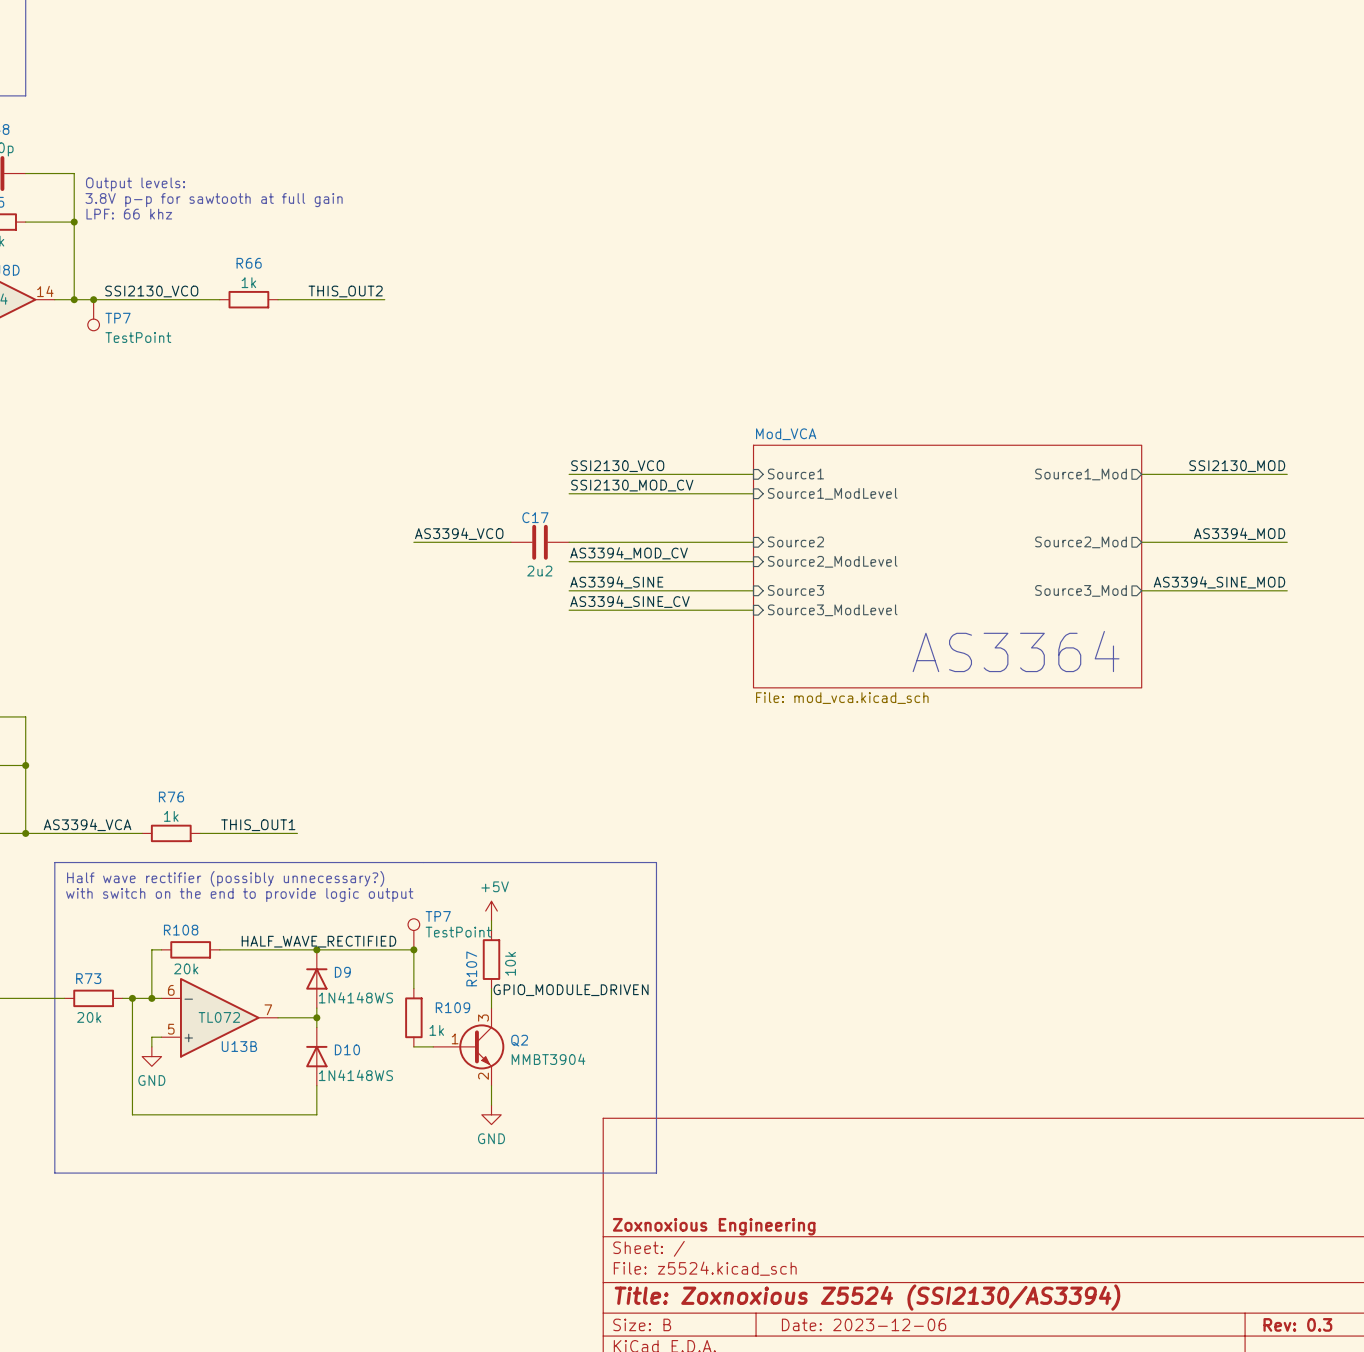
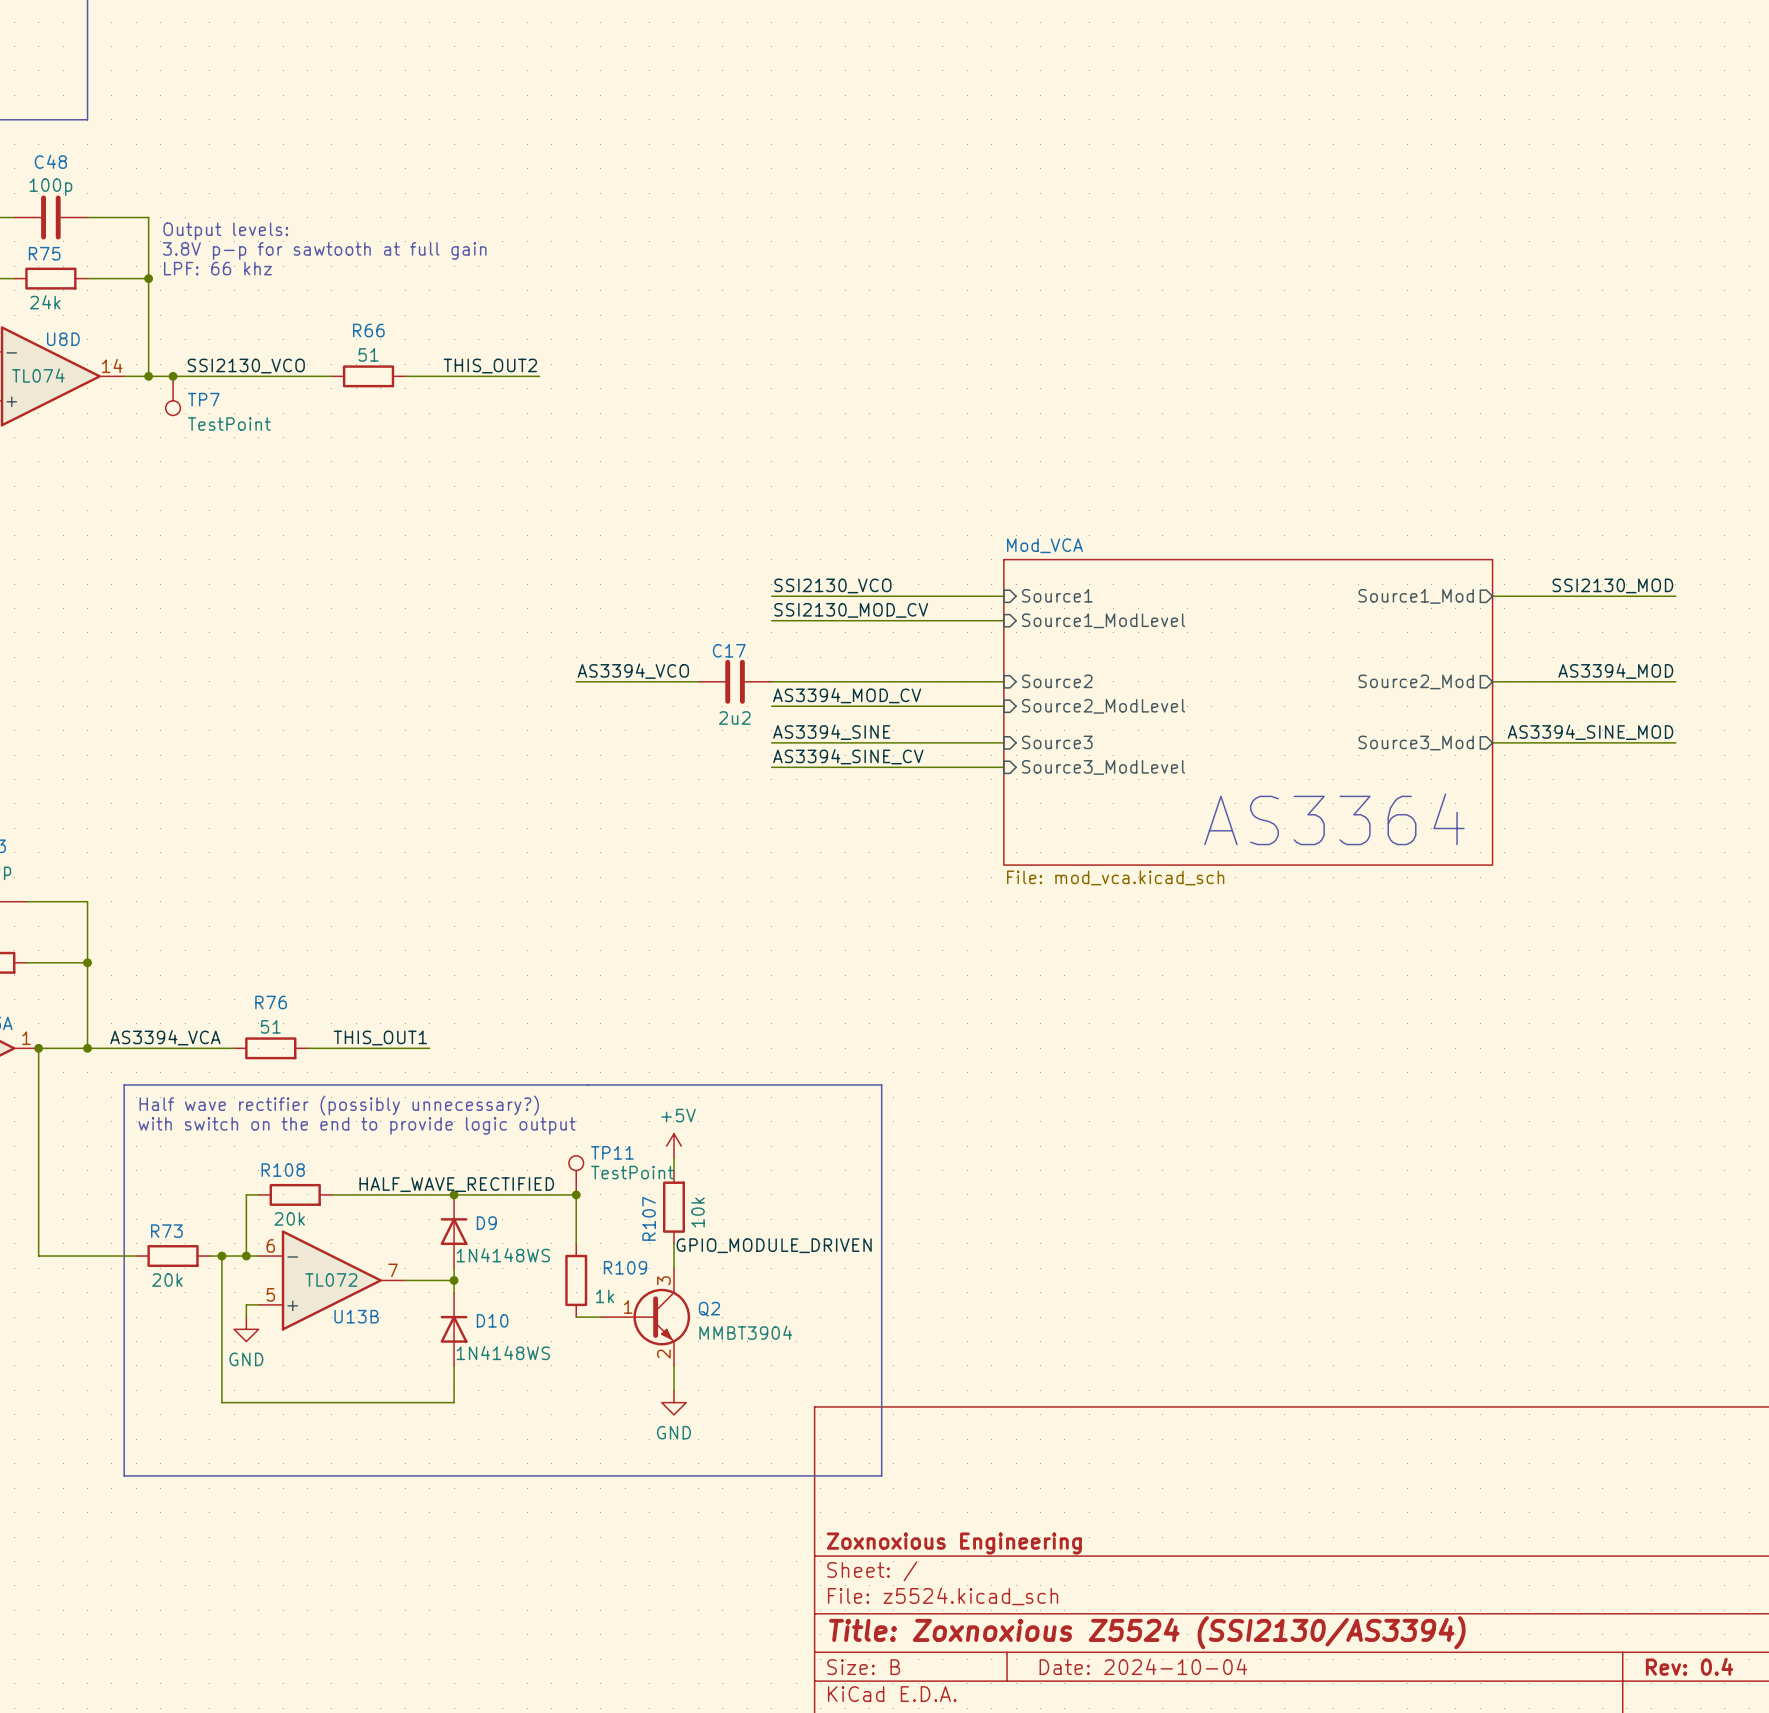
R66 value: 1k (248, 282) -> 51 (368, 354)
R76 value: 1k (171, 816) -> 51 (270, 1026)
TP7 name: TP7 (438, 916) -> TP11 (612, 1152)
title block: Date: 2023-12-06 (864, 1324) -> Date: 2024-10-04 (1143, 1666)
title block: Rev: 0.3 (1297, 1324) -> Rev: 0.4 (1689, 1666)

